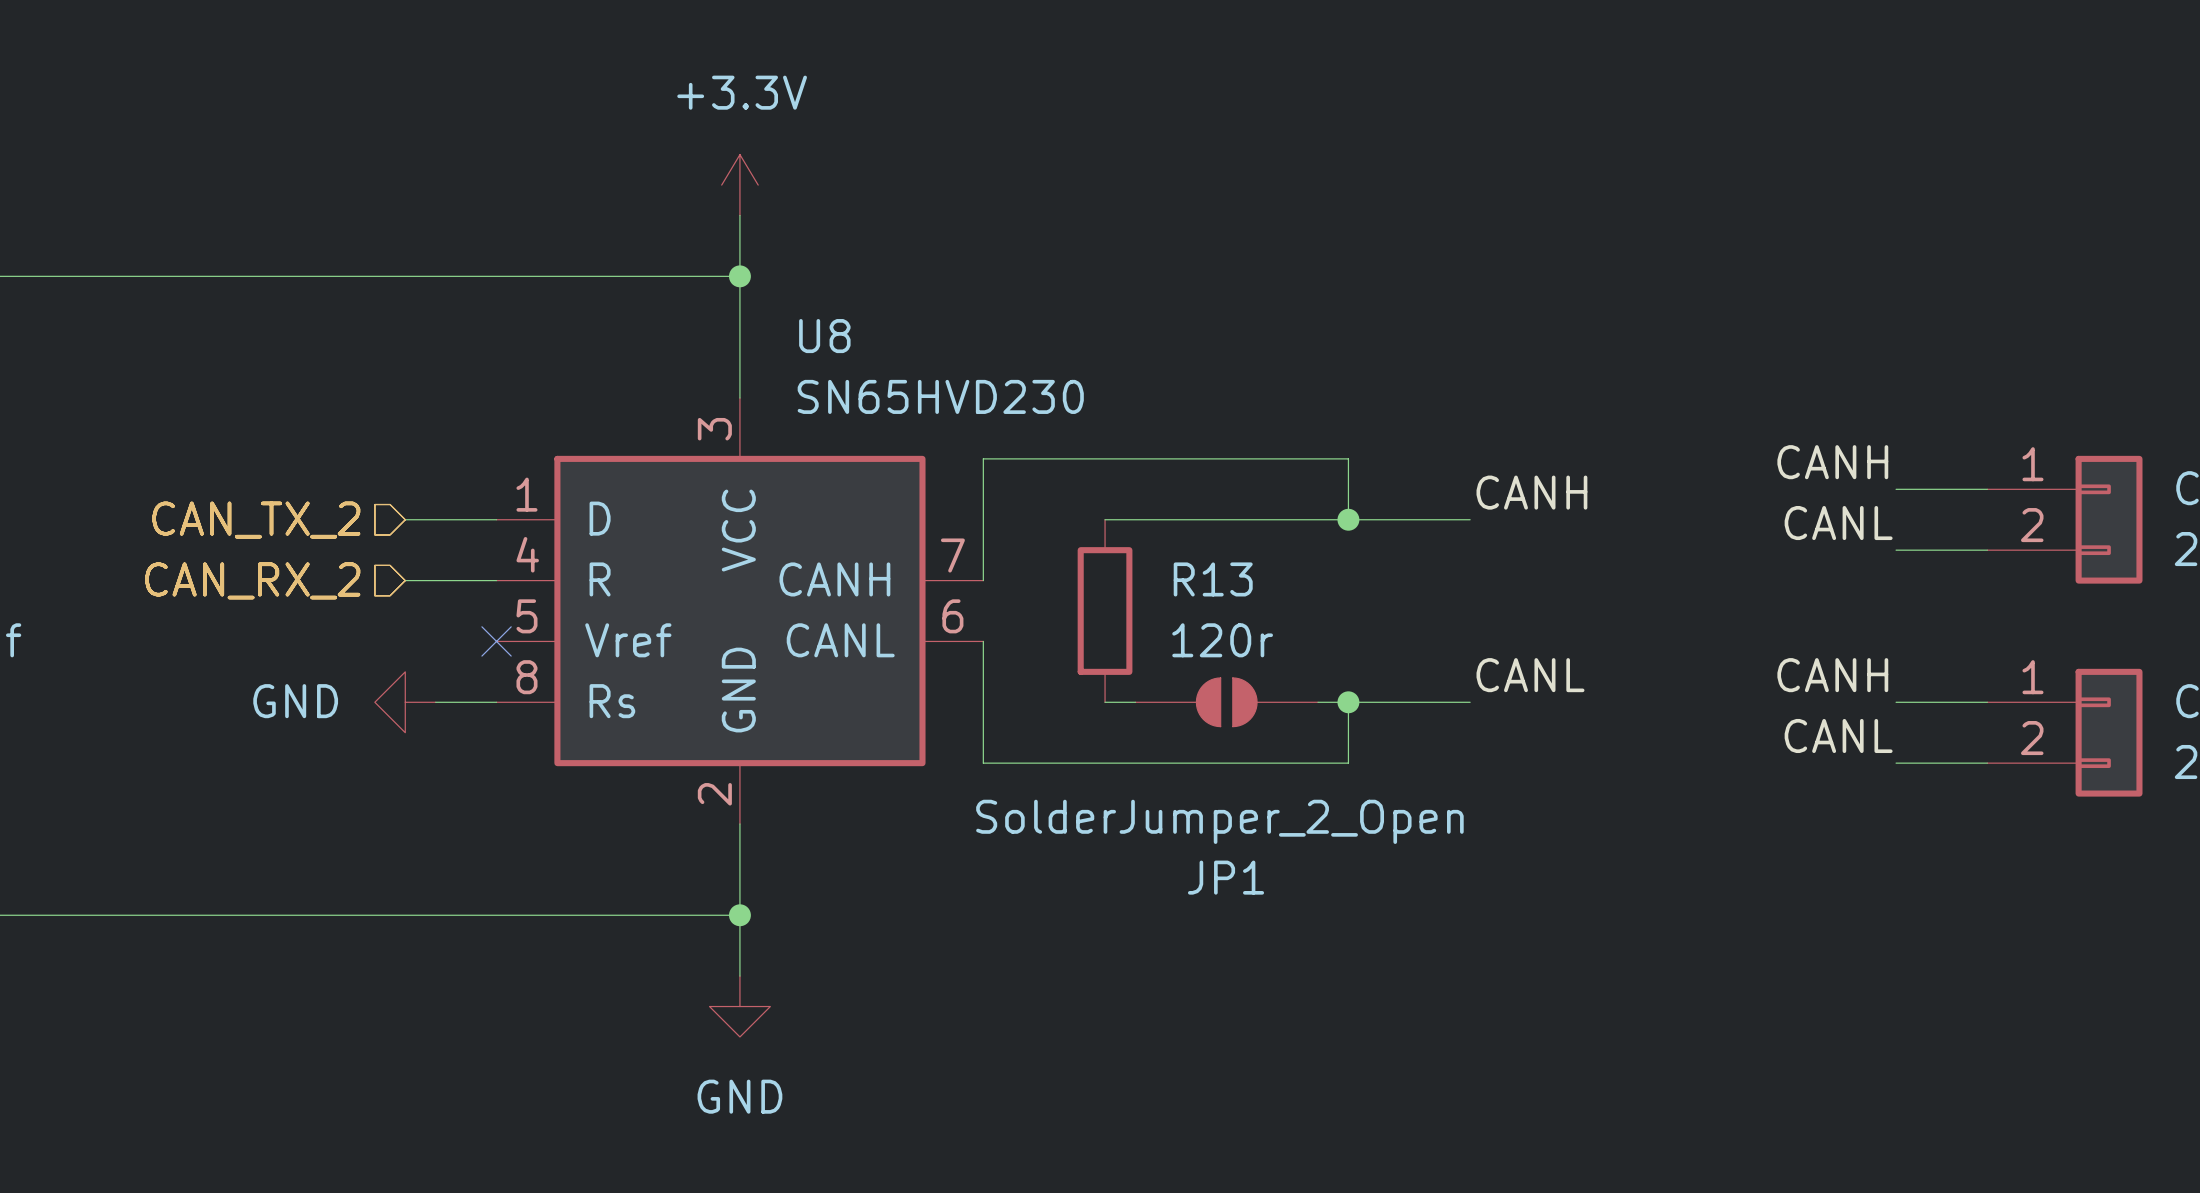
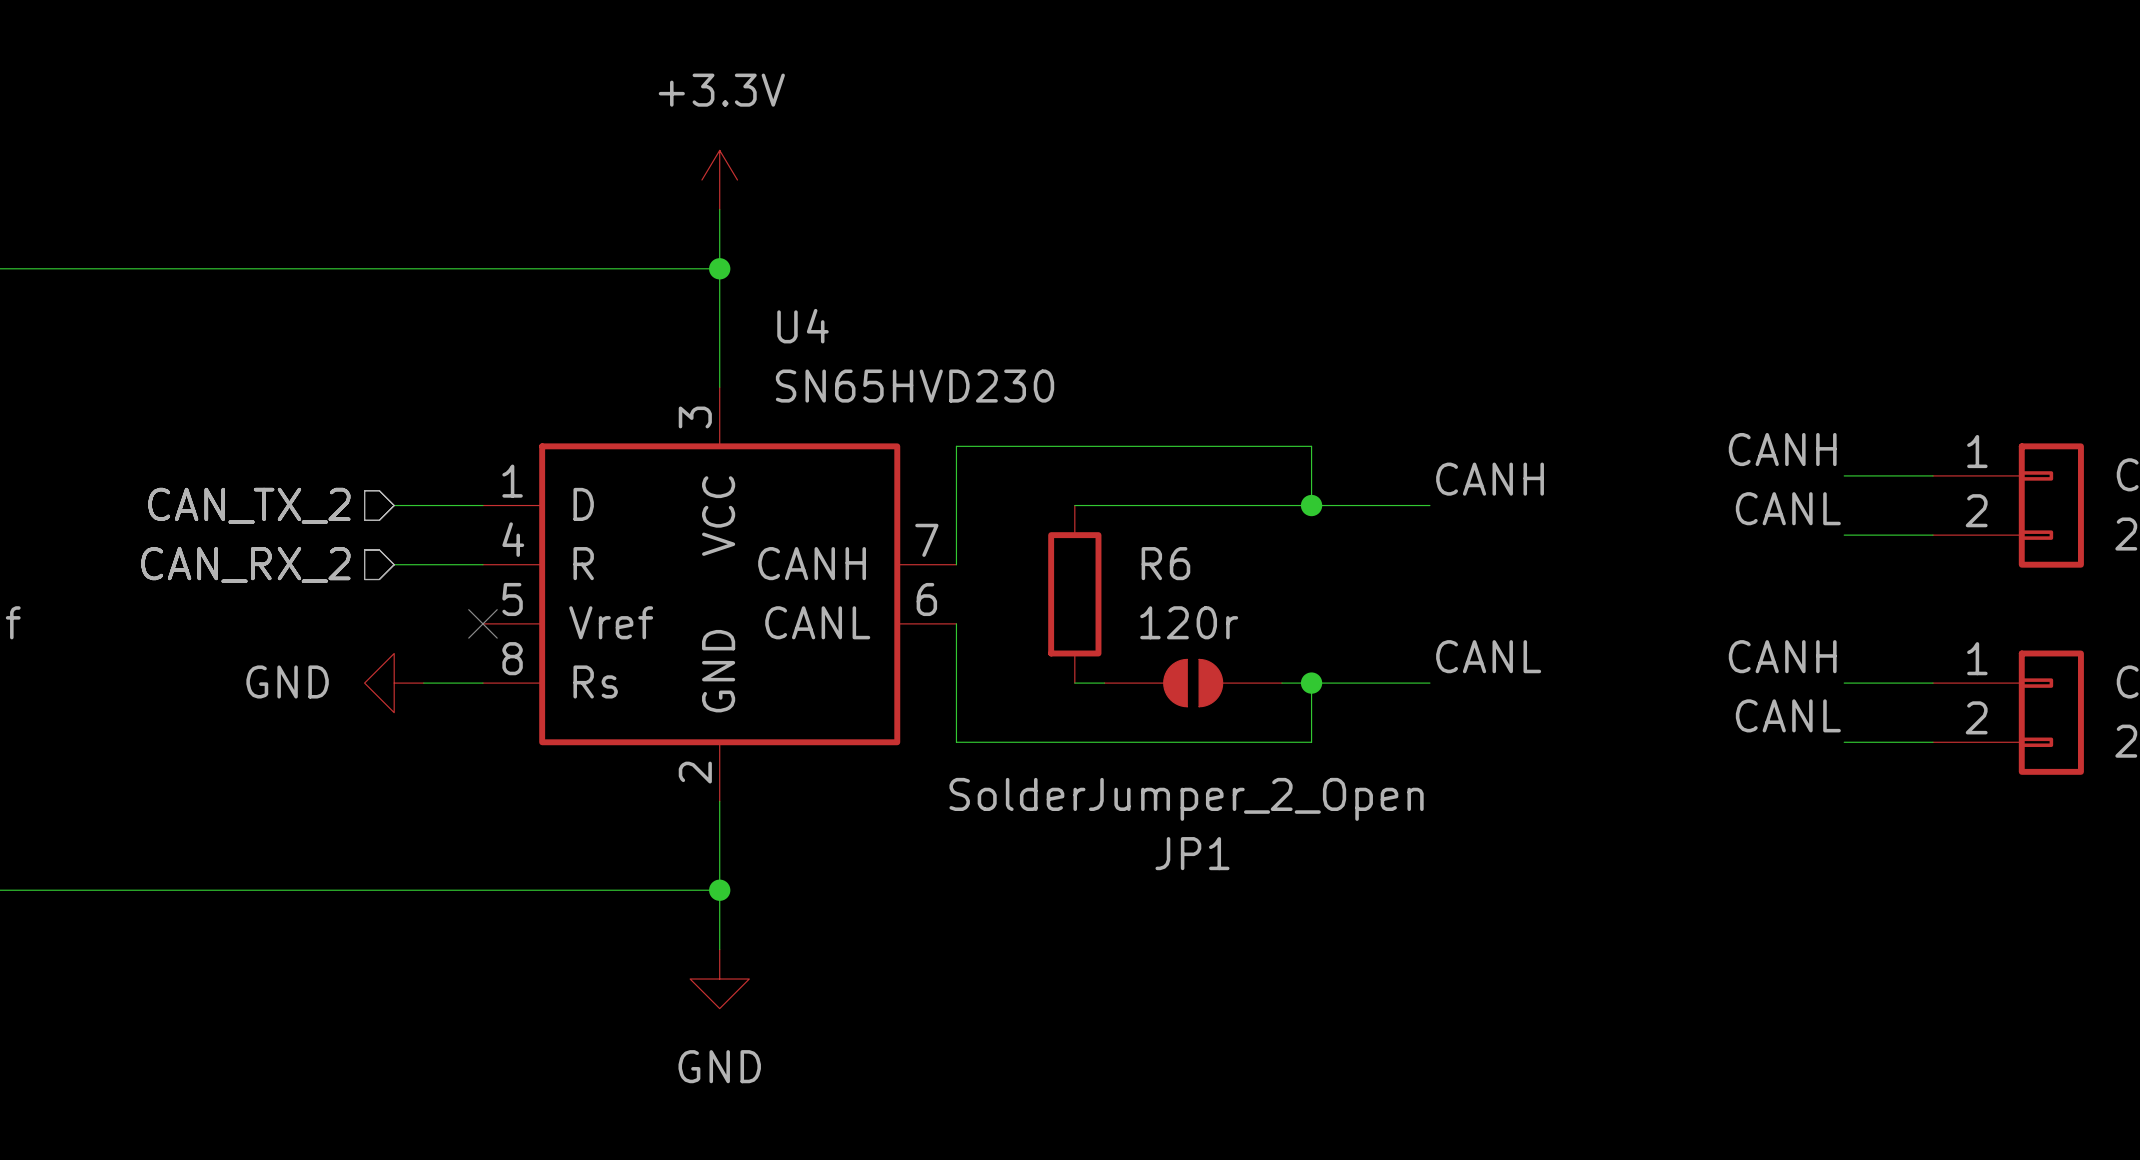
U8 name: U8 (824, 336) -> U4 (802, 326)
R13 name: R13 (1213, 579) -> R6 (1165, 563)

